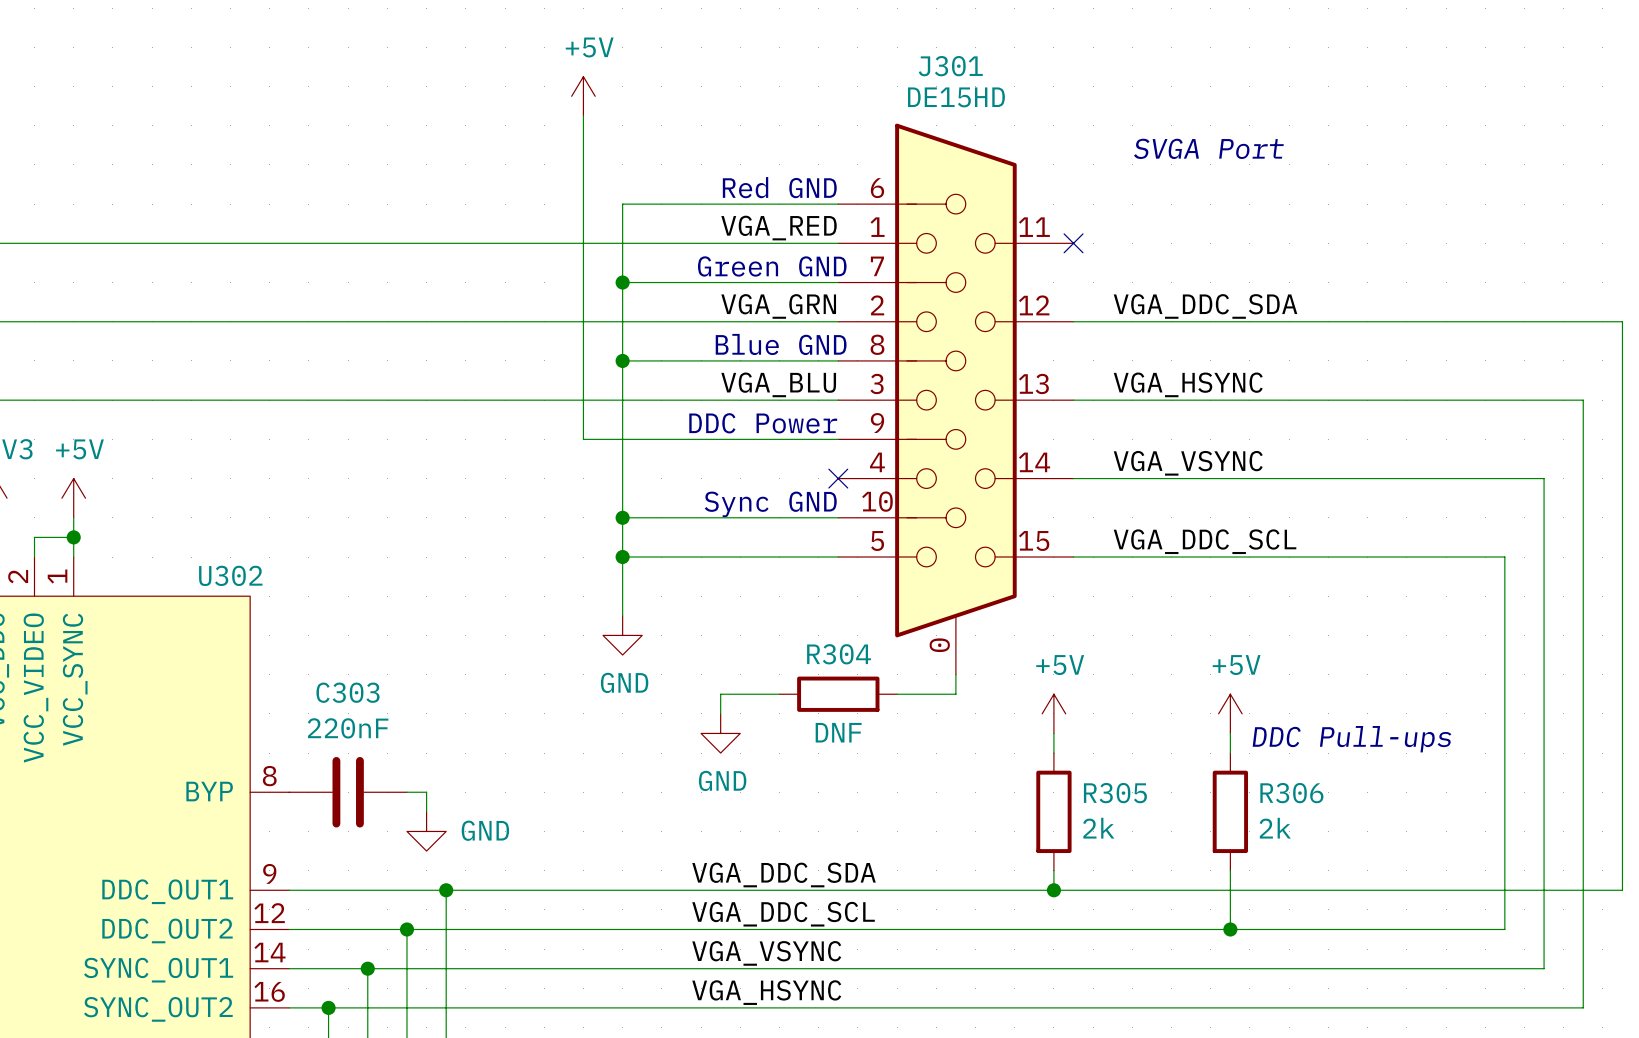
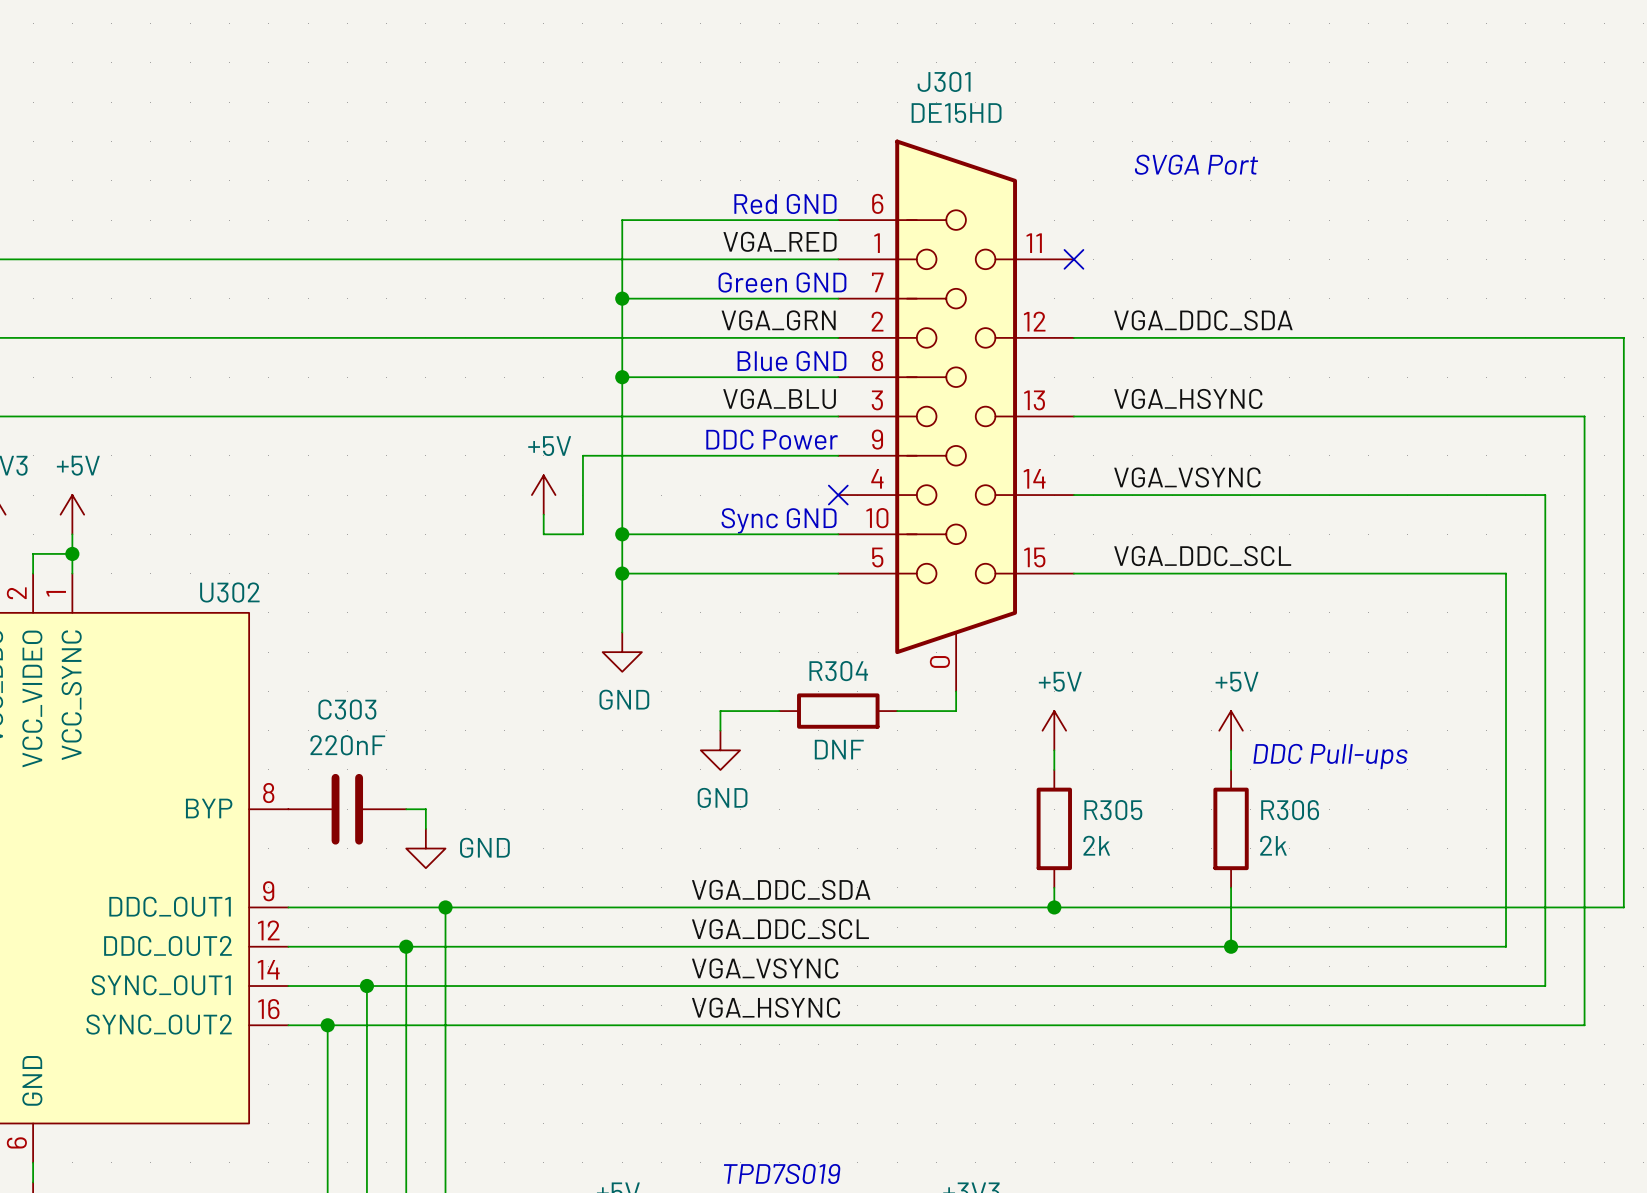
power symbol position: +5V (583, 96) -> +5V (543, 495)
wire: (583, 115) (583, 439) -> (543, 514) (543, 534) (582, 534) (582, 455)

